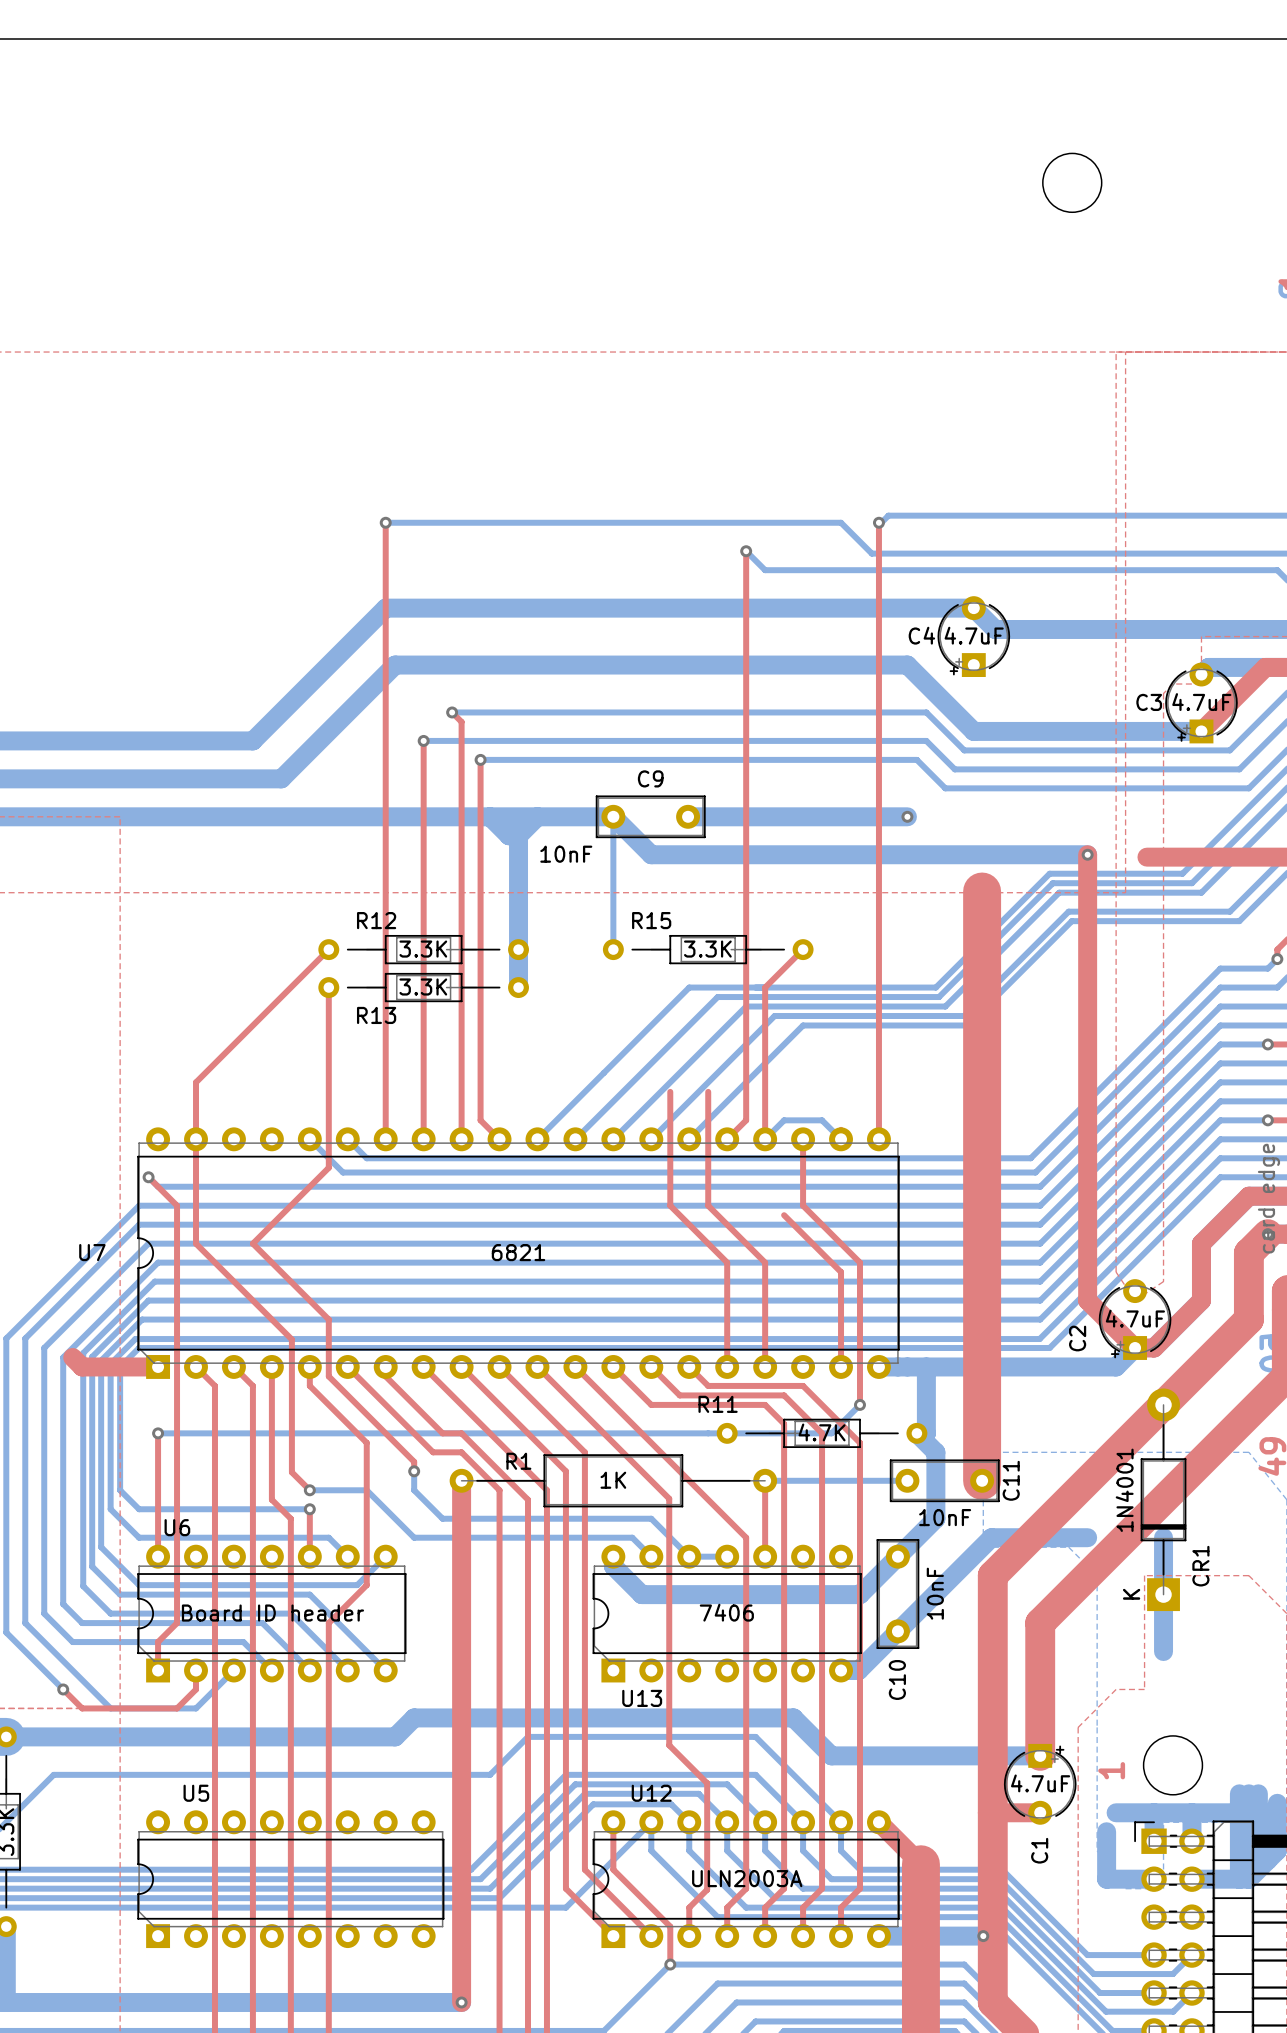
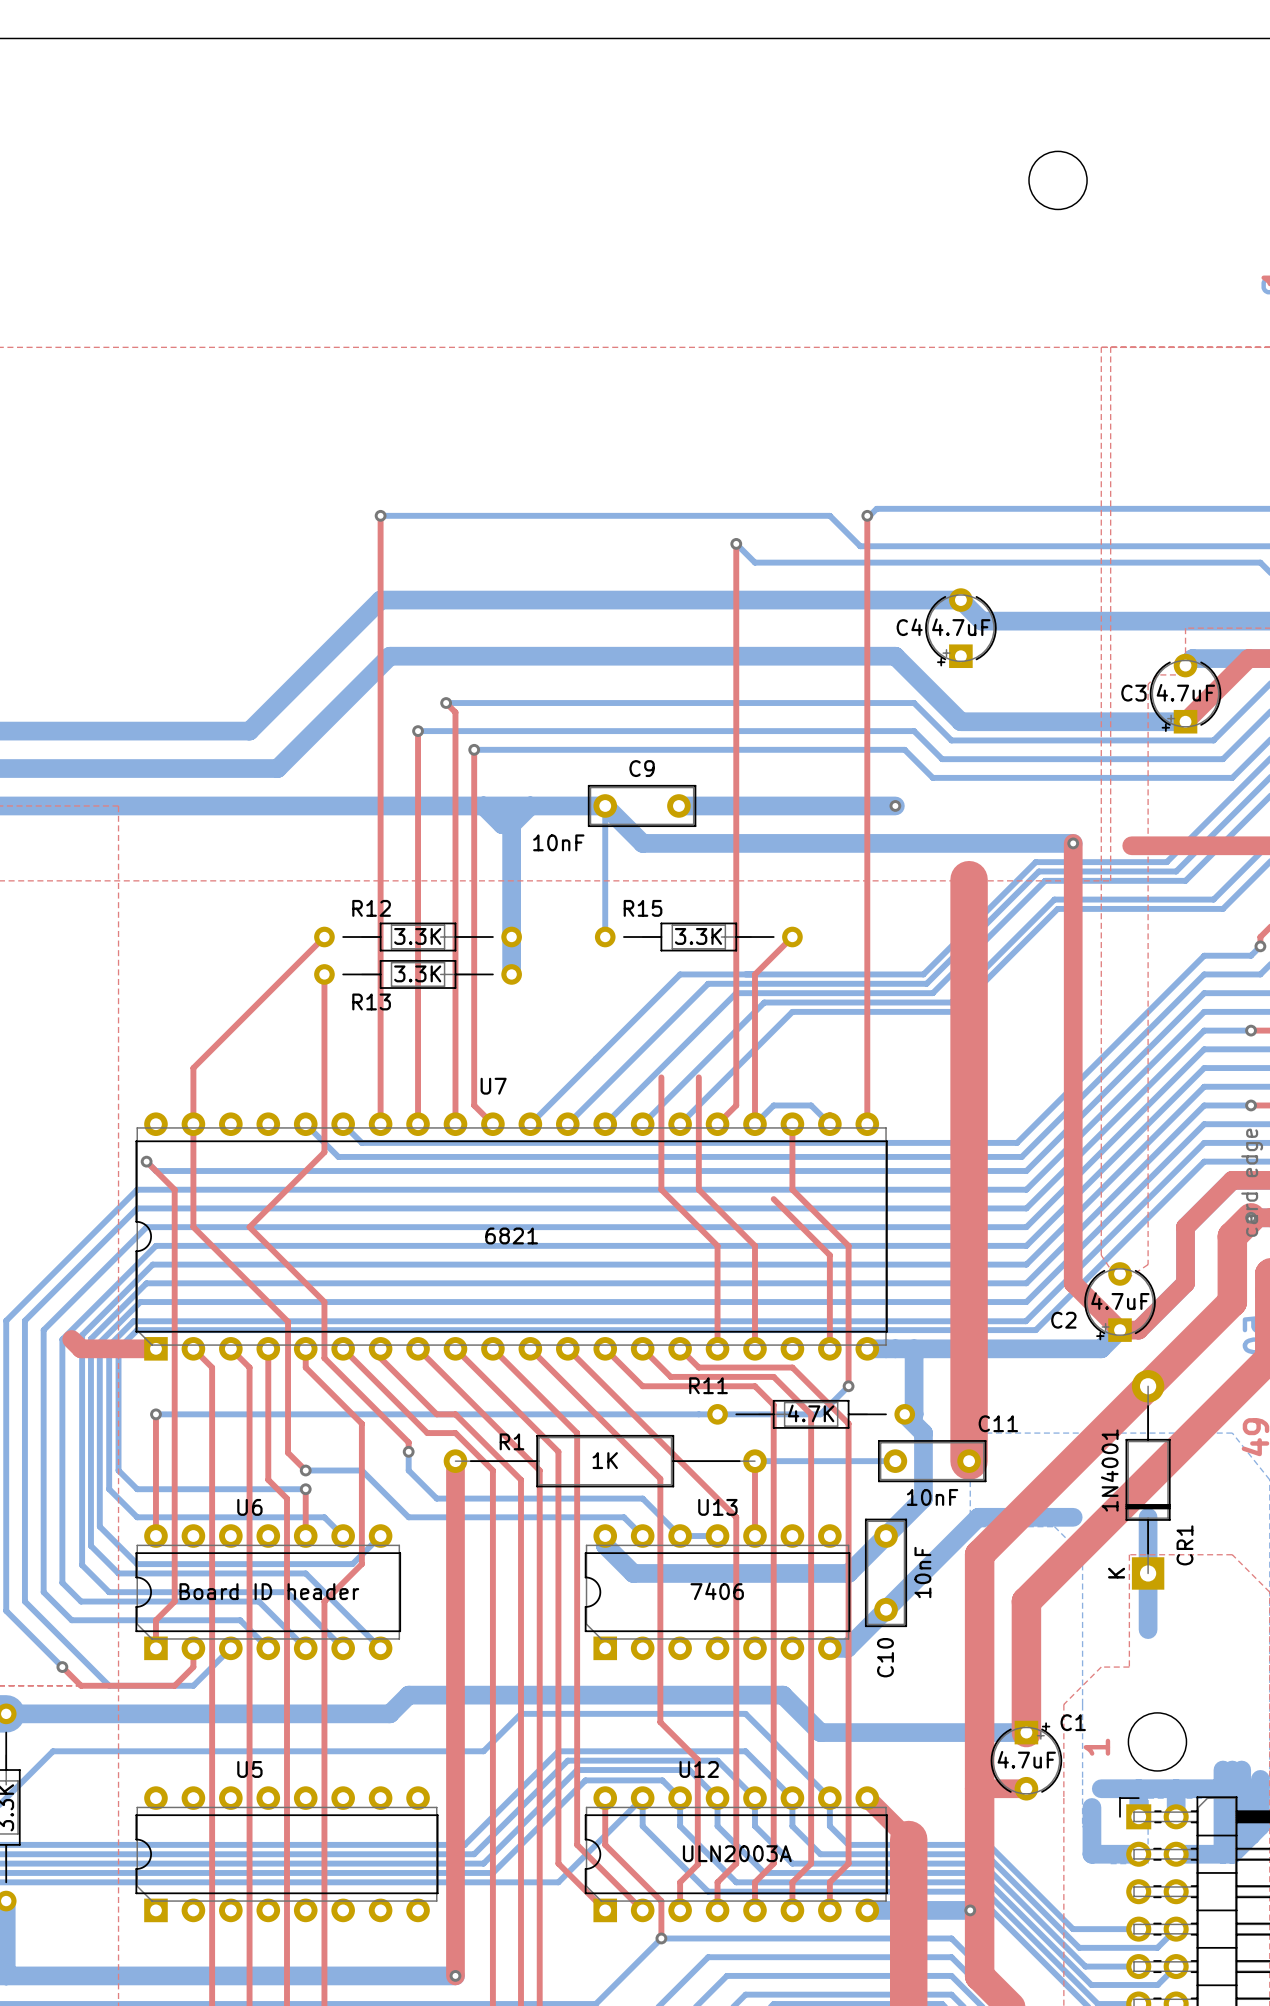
U7 name position: U7 (92, 1252) -> U7 (493, 1086)
C2 name rotation: 0° (1077, 1338) -> 90° clockwise (1063, 1320)
C11 name rotation: 0° (1011, 1480) -> 90° clockwise (998, 1423)
U6 name position: U6 (177, 1527) -> U6 (249, 1507)
U13 name position: U13 (642, 1698) -> U13 (717, 1507)
U5 name position: U5 (196, 1793) -> U5 (249, 1769)
U12 name position: U12 (651, 1793) -> U12 (699, 1769)
C1 name rotation: 0° (1039, 1850) -> 90° clockwise (1073, 1722)
C1 name position: C1 (1039, 1850) -> C1 (1073, 1722)

